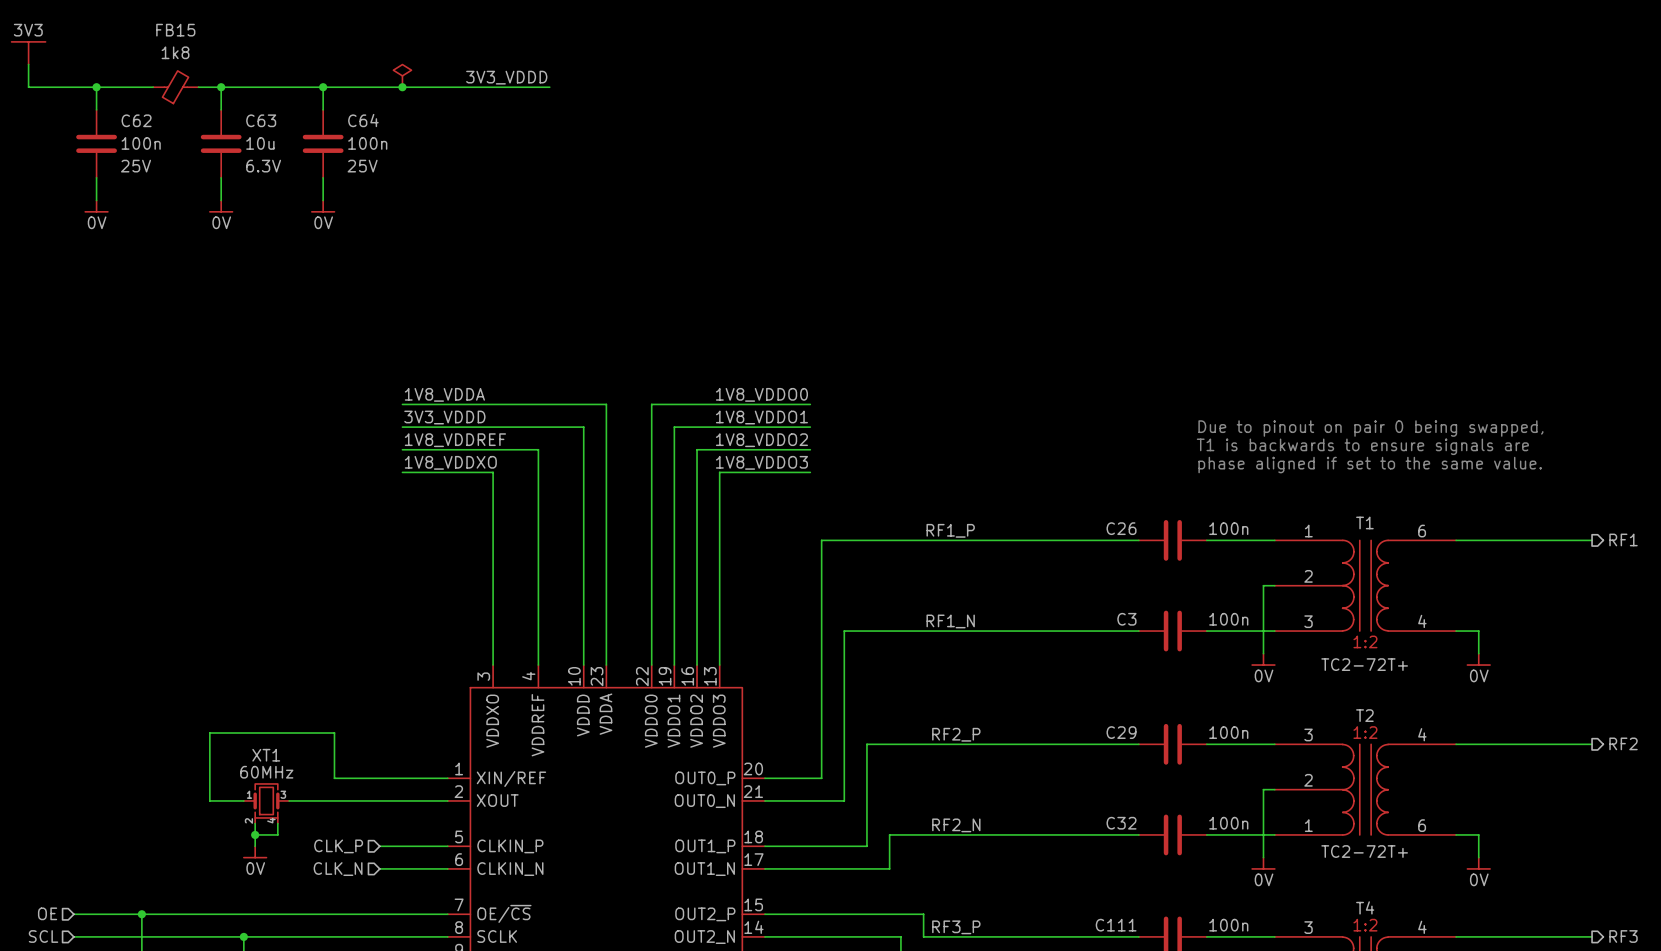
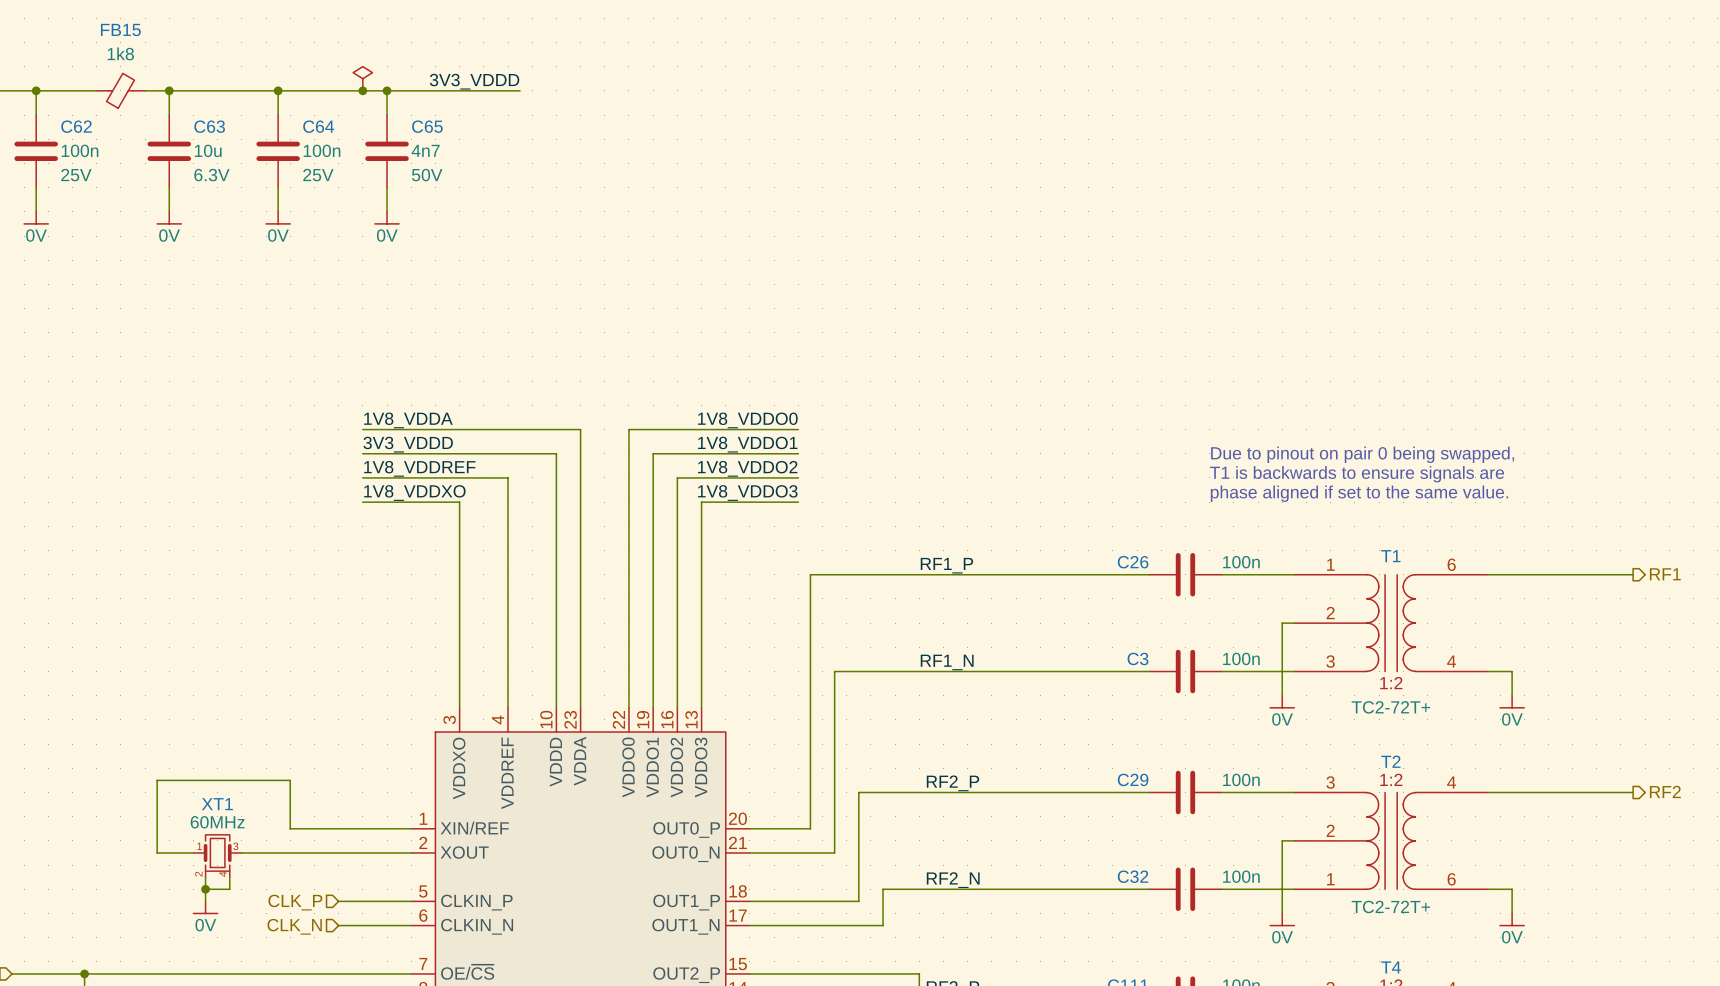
wire: none -> (387, 90) (387, 115)
junction: none -> (387, 90)
C65: none -> 4n7 (387, 151)
wire: none -> (387, 187) (387, 211)
power symbol: none -> 0V (387, 217)

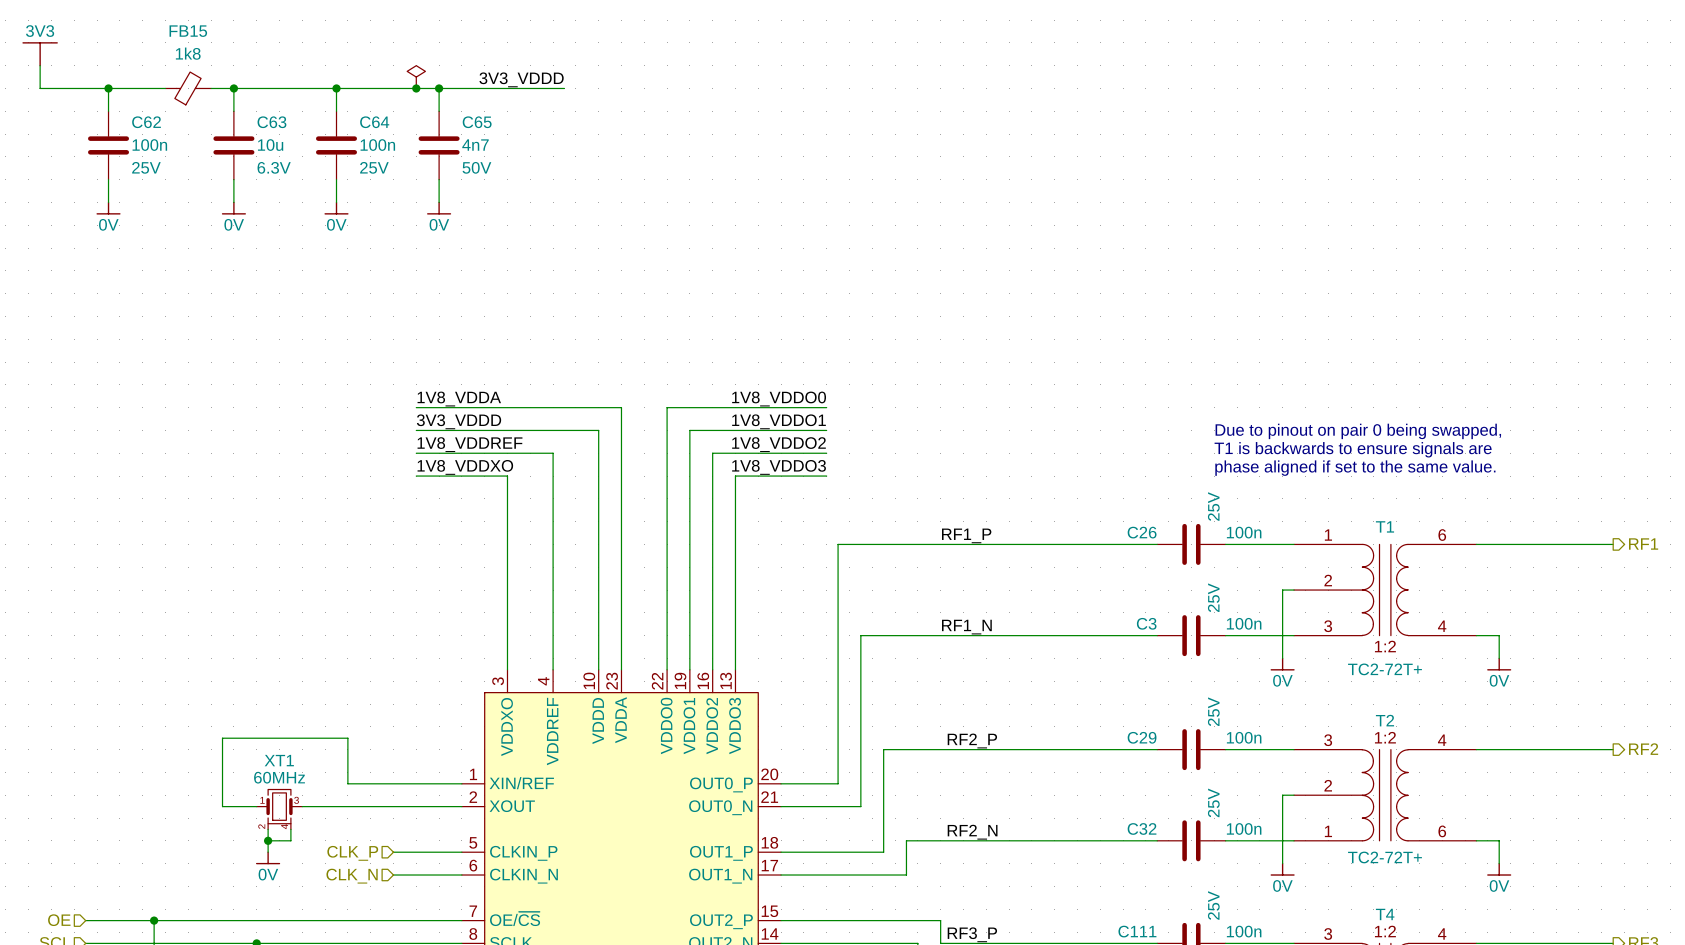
C26 text: none -> 25V (1213, 506)
C3 text: none -> 25V (1213, 597)
C29 text: none -> 25V (1213, 711)
C32 text: none -> 25V (1213, 802)
C111 text: none -> 25V (1213, 905)

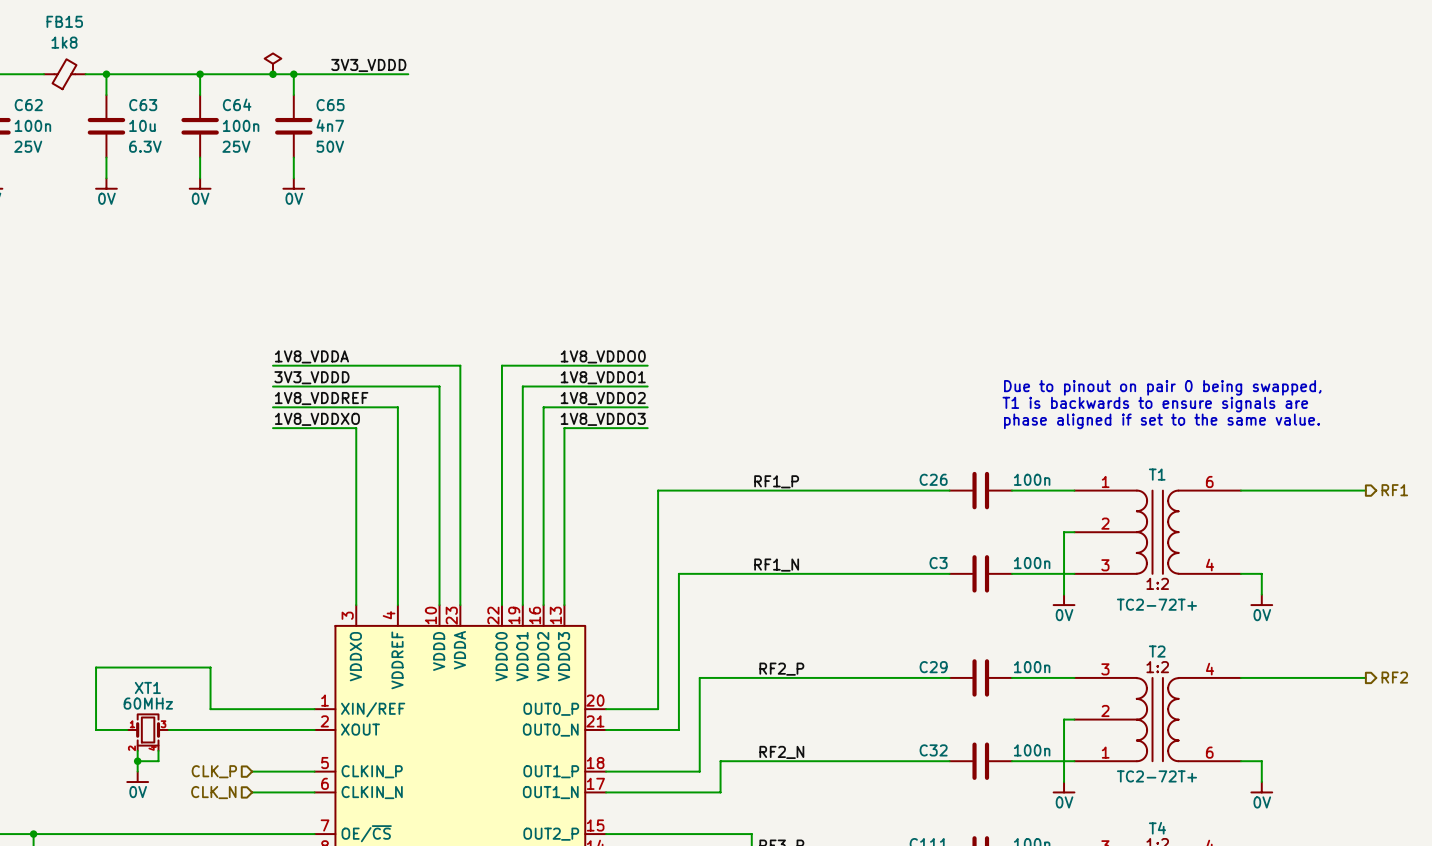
C26 text: 25V (1213, 506) -> none
C3 text: 25V (1213, 597) -> none
C29 text: 25V (1213, 711) -> none
C32 text: 25V (1213, 802) -> none
C111 text: 25V (1213, 905) -> none

